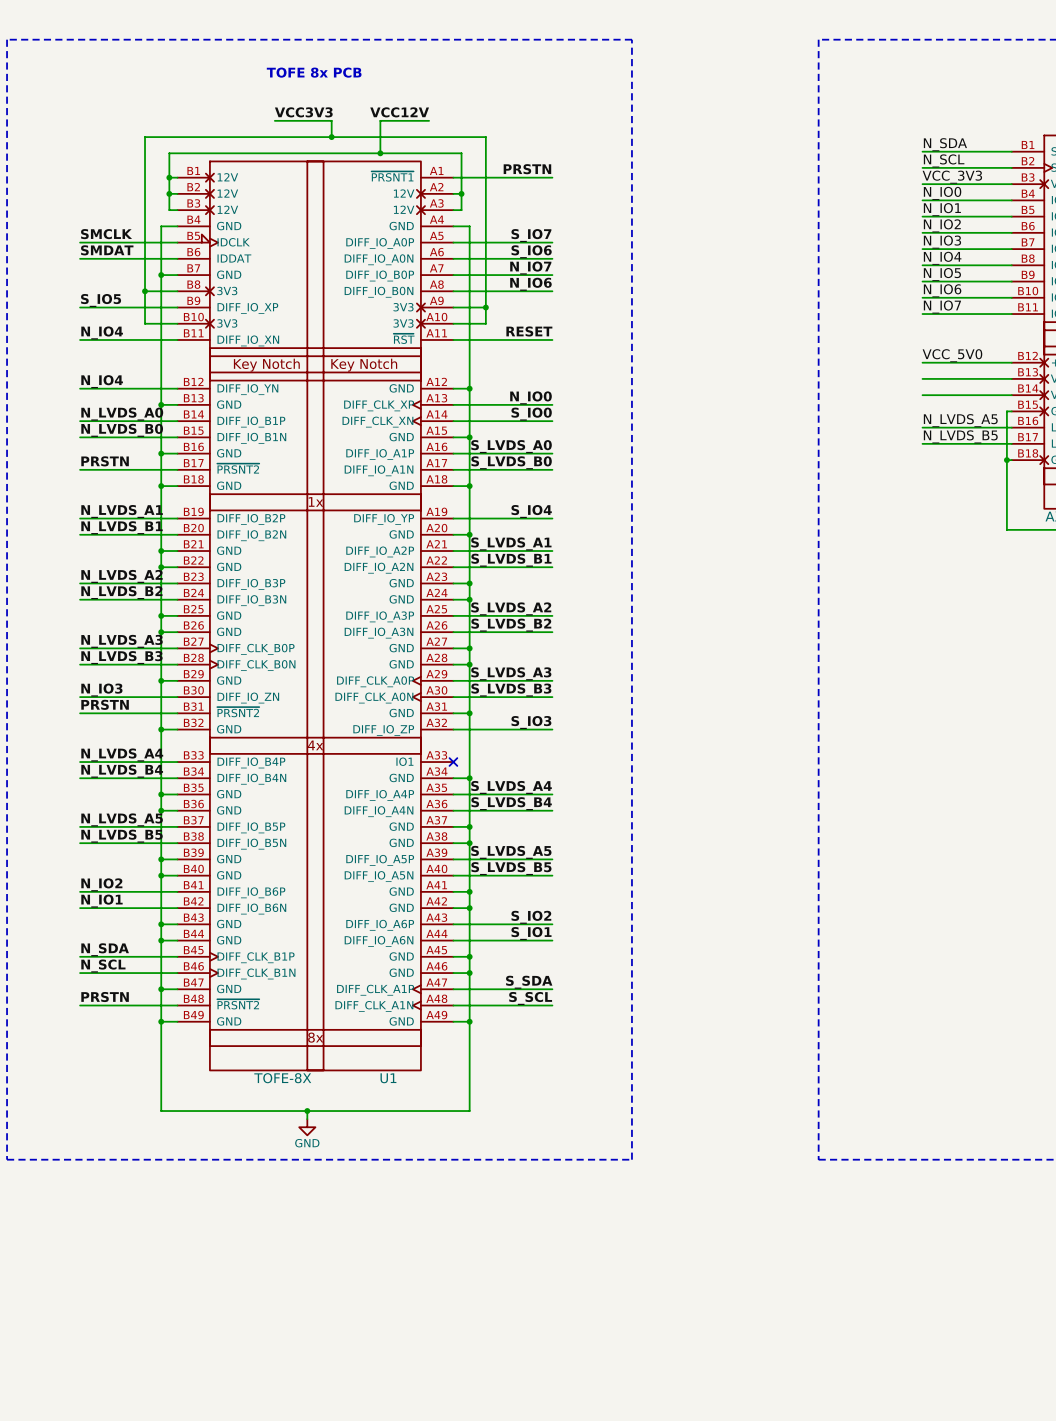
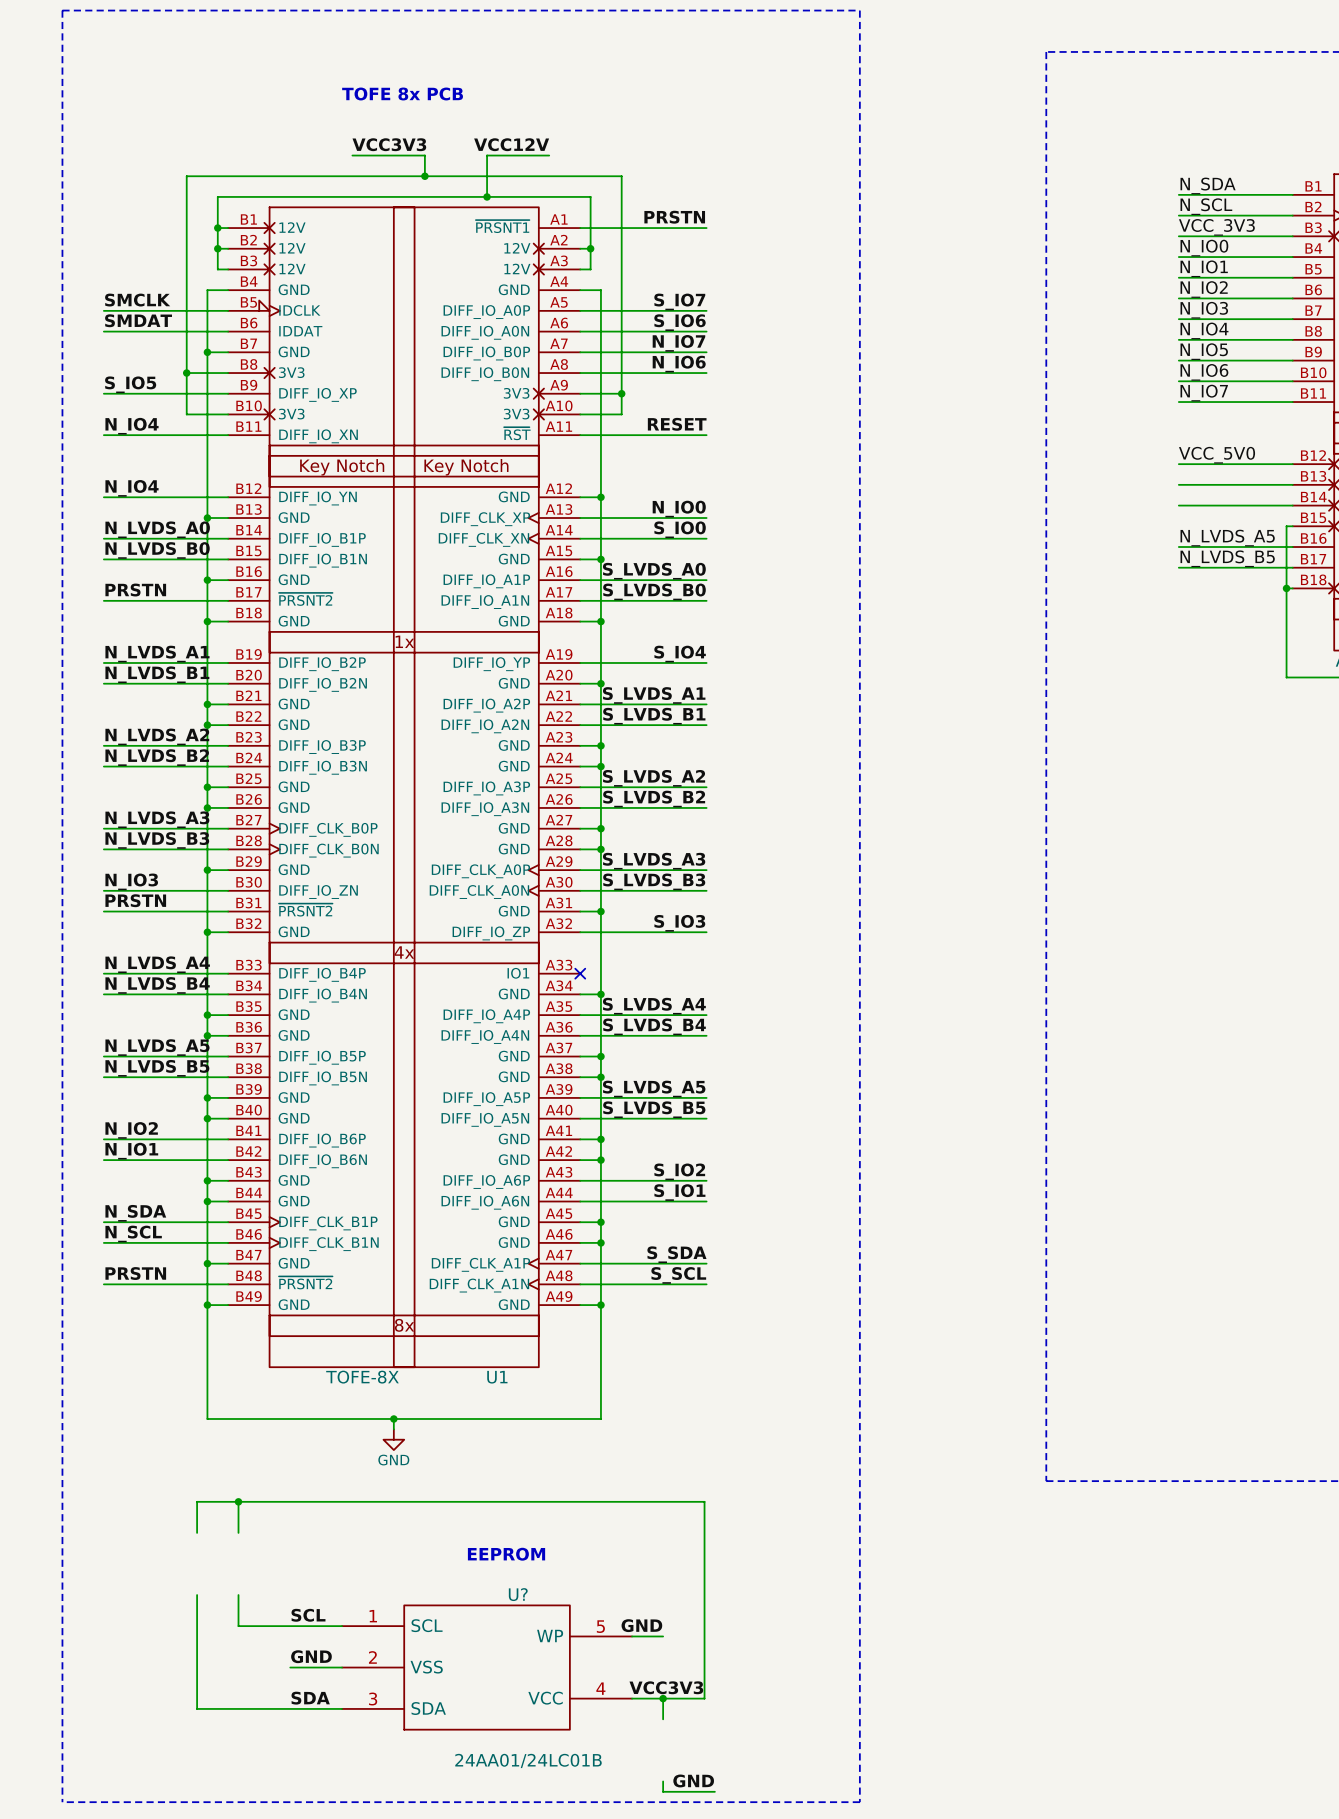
line: (7, 39) (631, 39) (631, 1159) (7, 1159) (7, 39) -> (62, 10) (62, 1802) (859, 1802) (859, 10) (62, 10)
wire: none -> (238, 1501) (238, 1532)
junction: none -> (238, 1501)
wire: none -> (197, 1532) (197, 1501) (704, 1501) (704, 1698) (632, 1698)
text: none -> EEPROM (506, 1554)
wire: none -> (197, 1595) (197, 1708) (342, 1708)
wire: none -> (238, 1595) (238, 1626) (342, 1626)
label: none -> SCL (308, 1615)
label: none -> GND (641, 1625)
wire: none -> (632, 1636) (663, 1636)
label: none -> GND (311, 1656)
wire: none -> (290, 1667) (342, 1667)
U?: none -> 24AA01/24LC01B (487, 1667)
label: none -> VCC3V3 (666, 1687)
label: none -> SDA (310, 1698)
wire: none -> (663, 1698) (663, 1719)
junction: none -> (663, 1698)
label: none -> GND (693, 1780)
wire: none -> (663, 1781) (663, 1791) (714, 1791)

